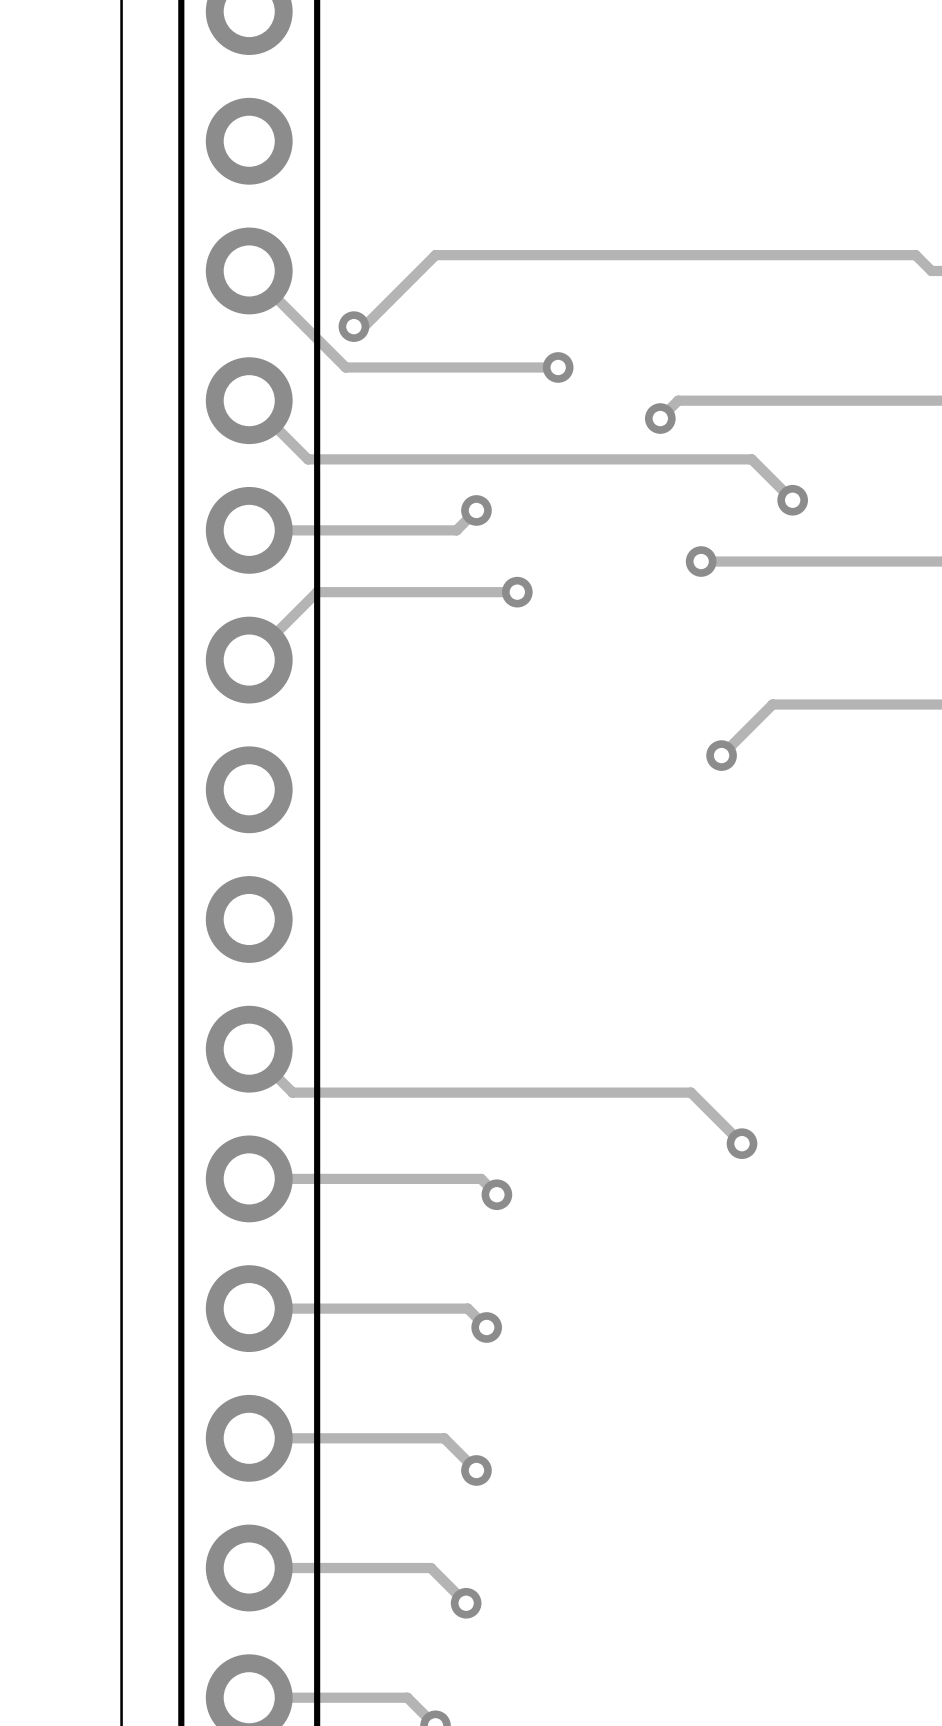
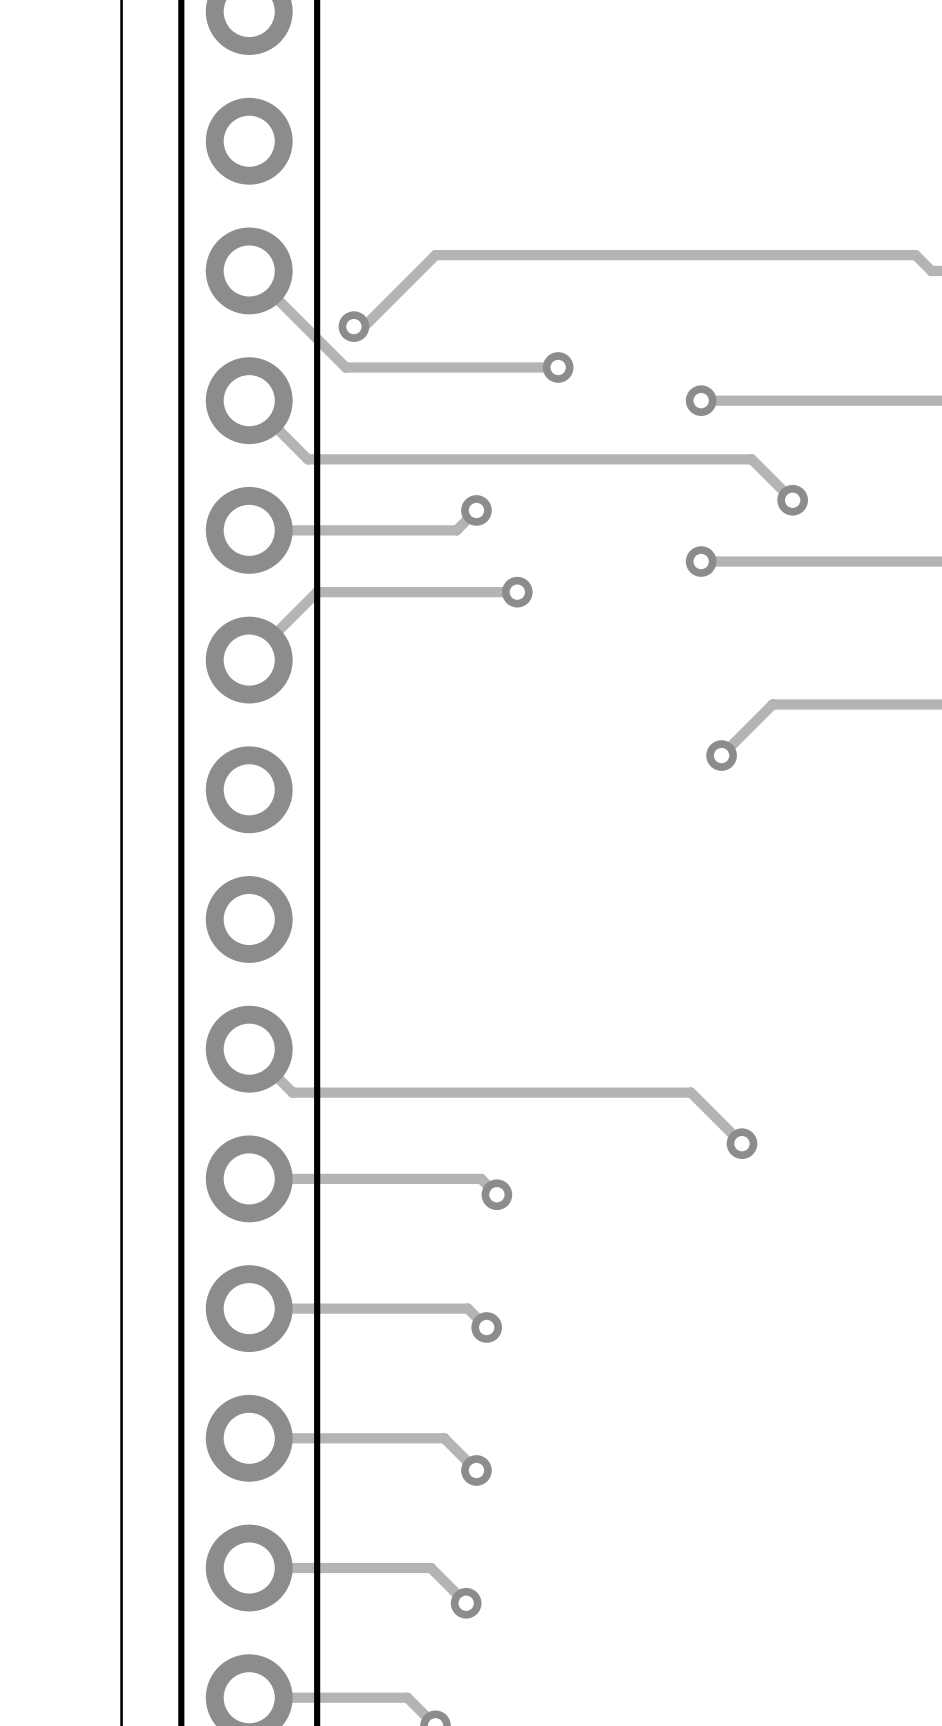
track: (701, 400) (678, 400) (660, 418) -> none
via position: (660, 418) -> (701, 400)

